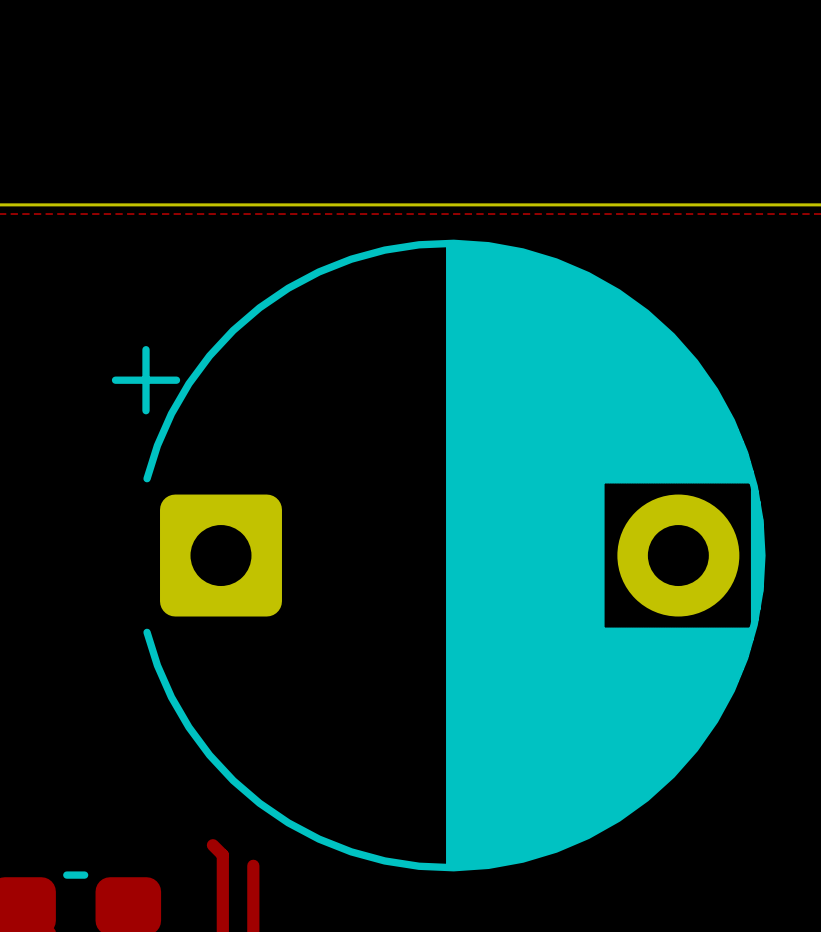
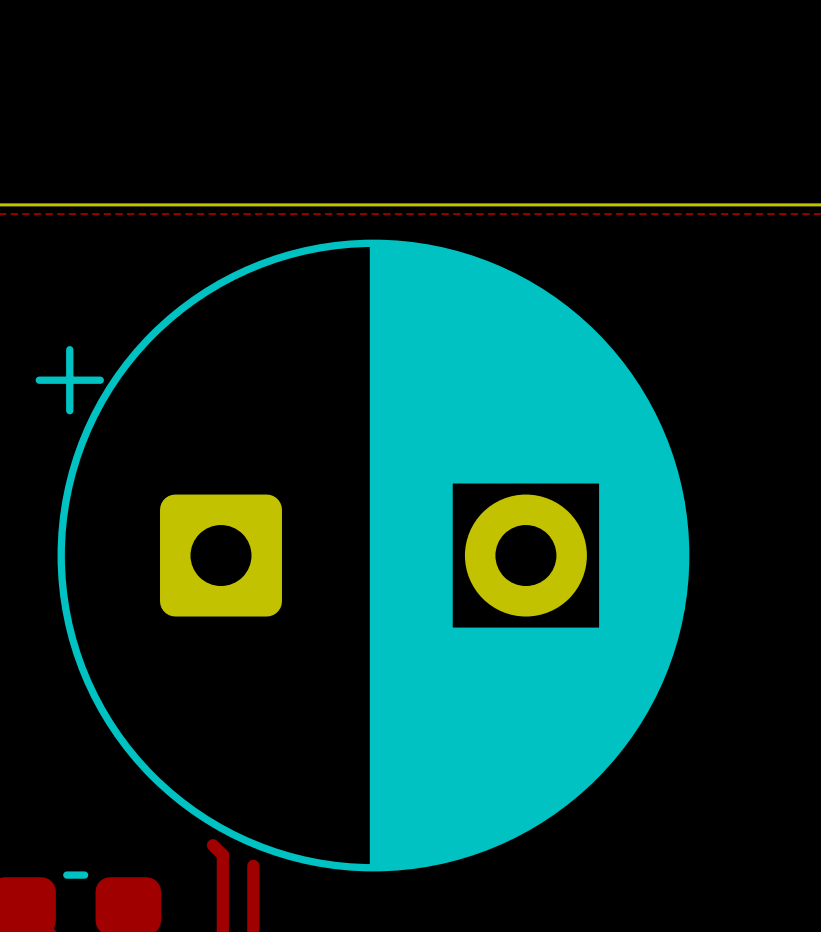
part: none -> (362, 555)
part: (438, 555) -> none

